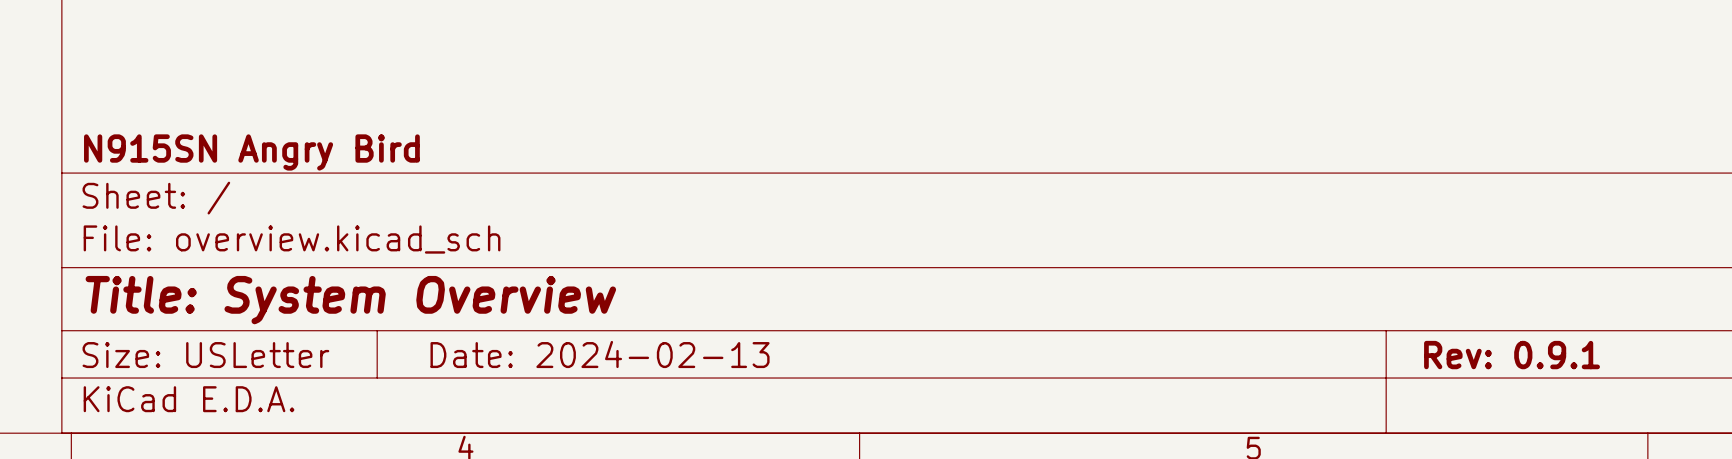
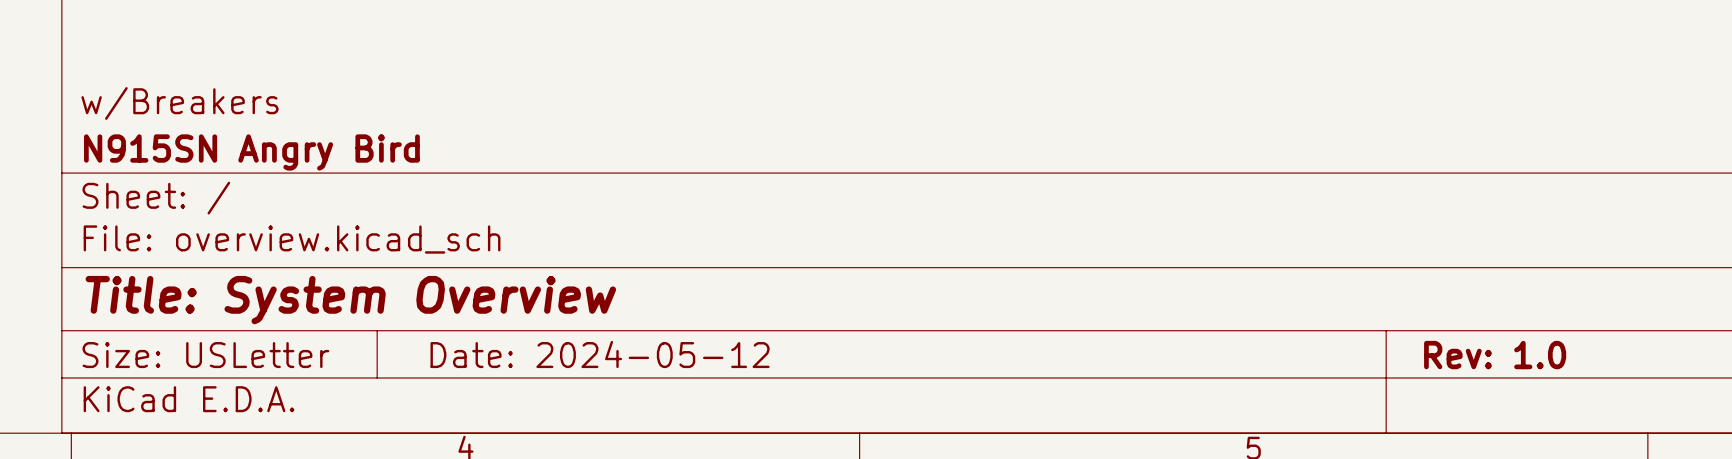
title block: none -> w/Breakers (180, 103)
title block: Date: 2024-02-13 (600, 354) -> Date: 2024-05-12 (600, 354)
title block: Rev: 0.9.1 (1512, 355) -> Rev: 1.0 (1495, 355)

